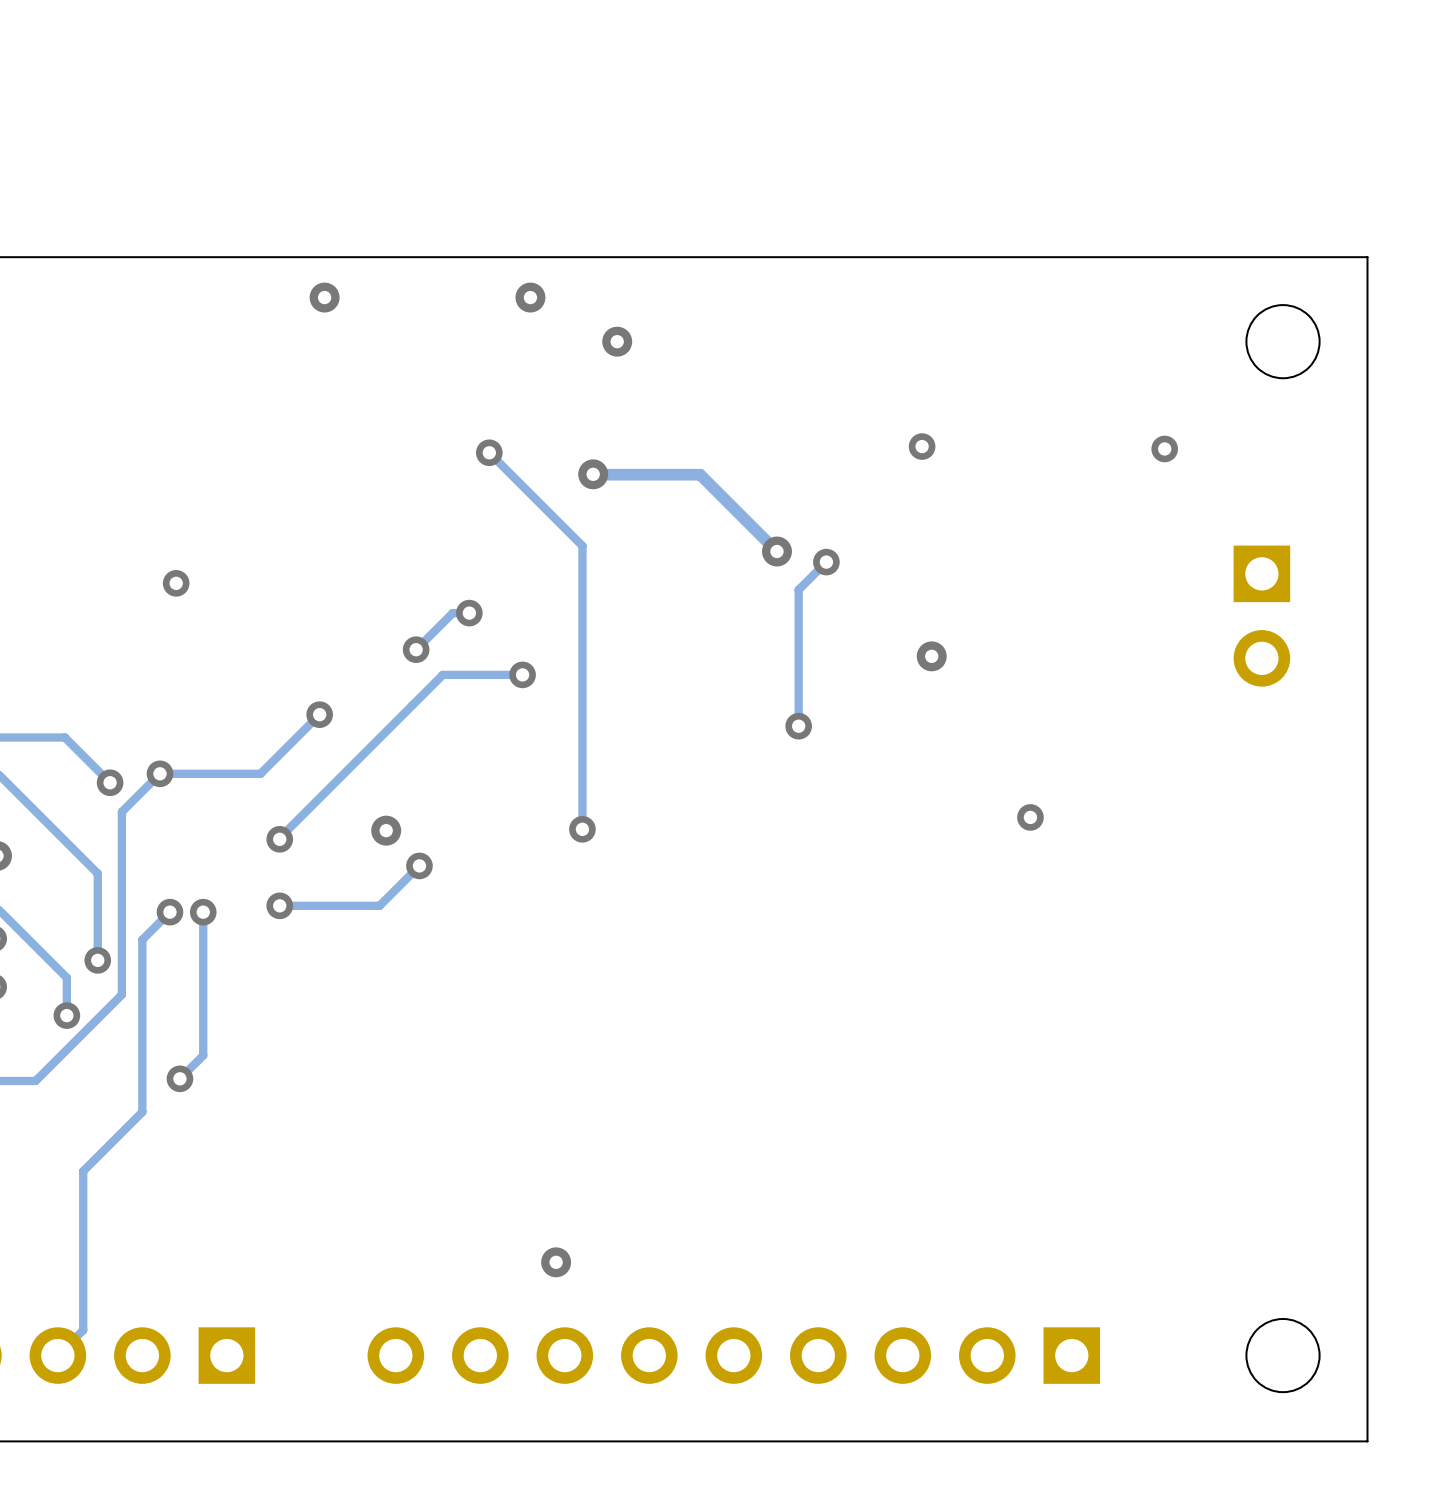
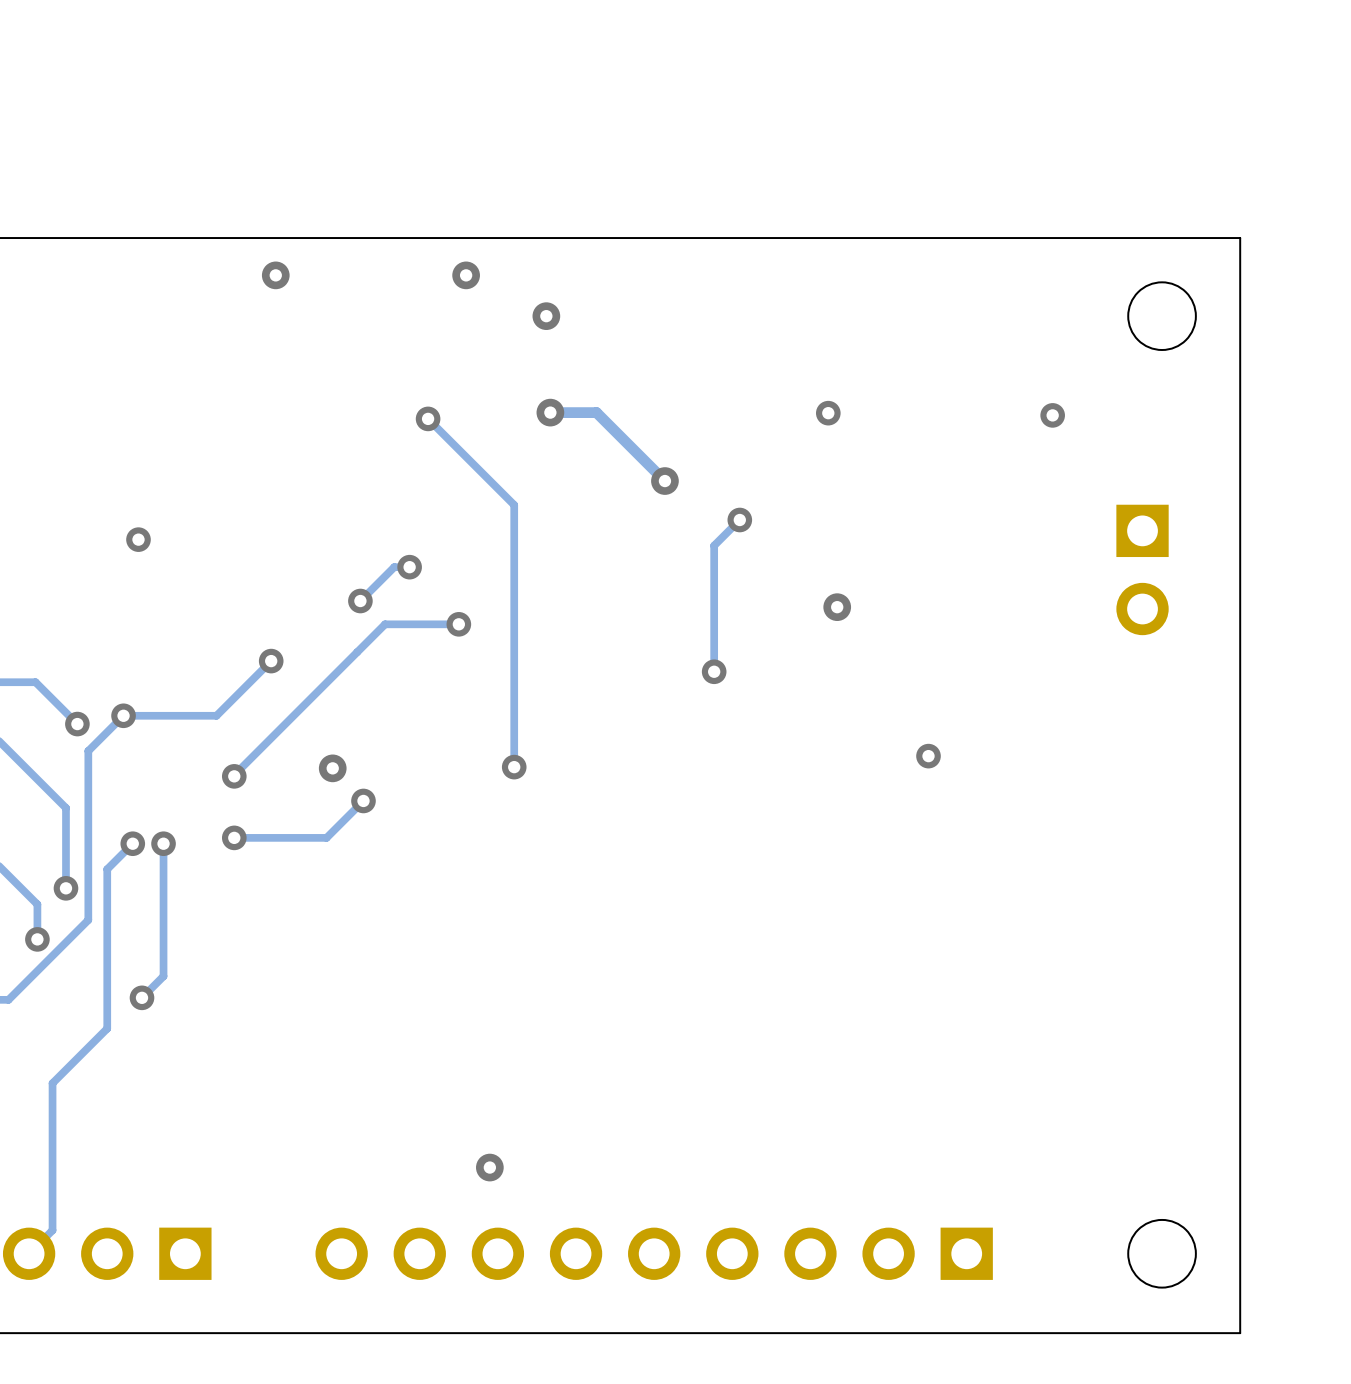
via position: (593, 474) -> (550, 412)
track: (700, 474) (593, 474) -> (623, 439) (596, 412) (550, 412)
track: (745, 519) (776, 551) -> none
via position: (776, 551) -> (664, 481)

